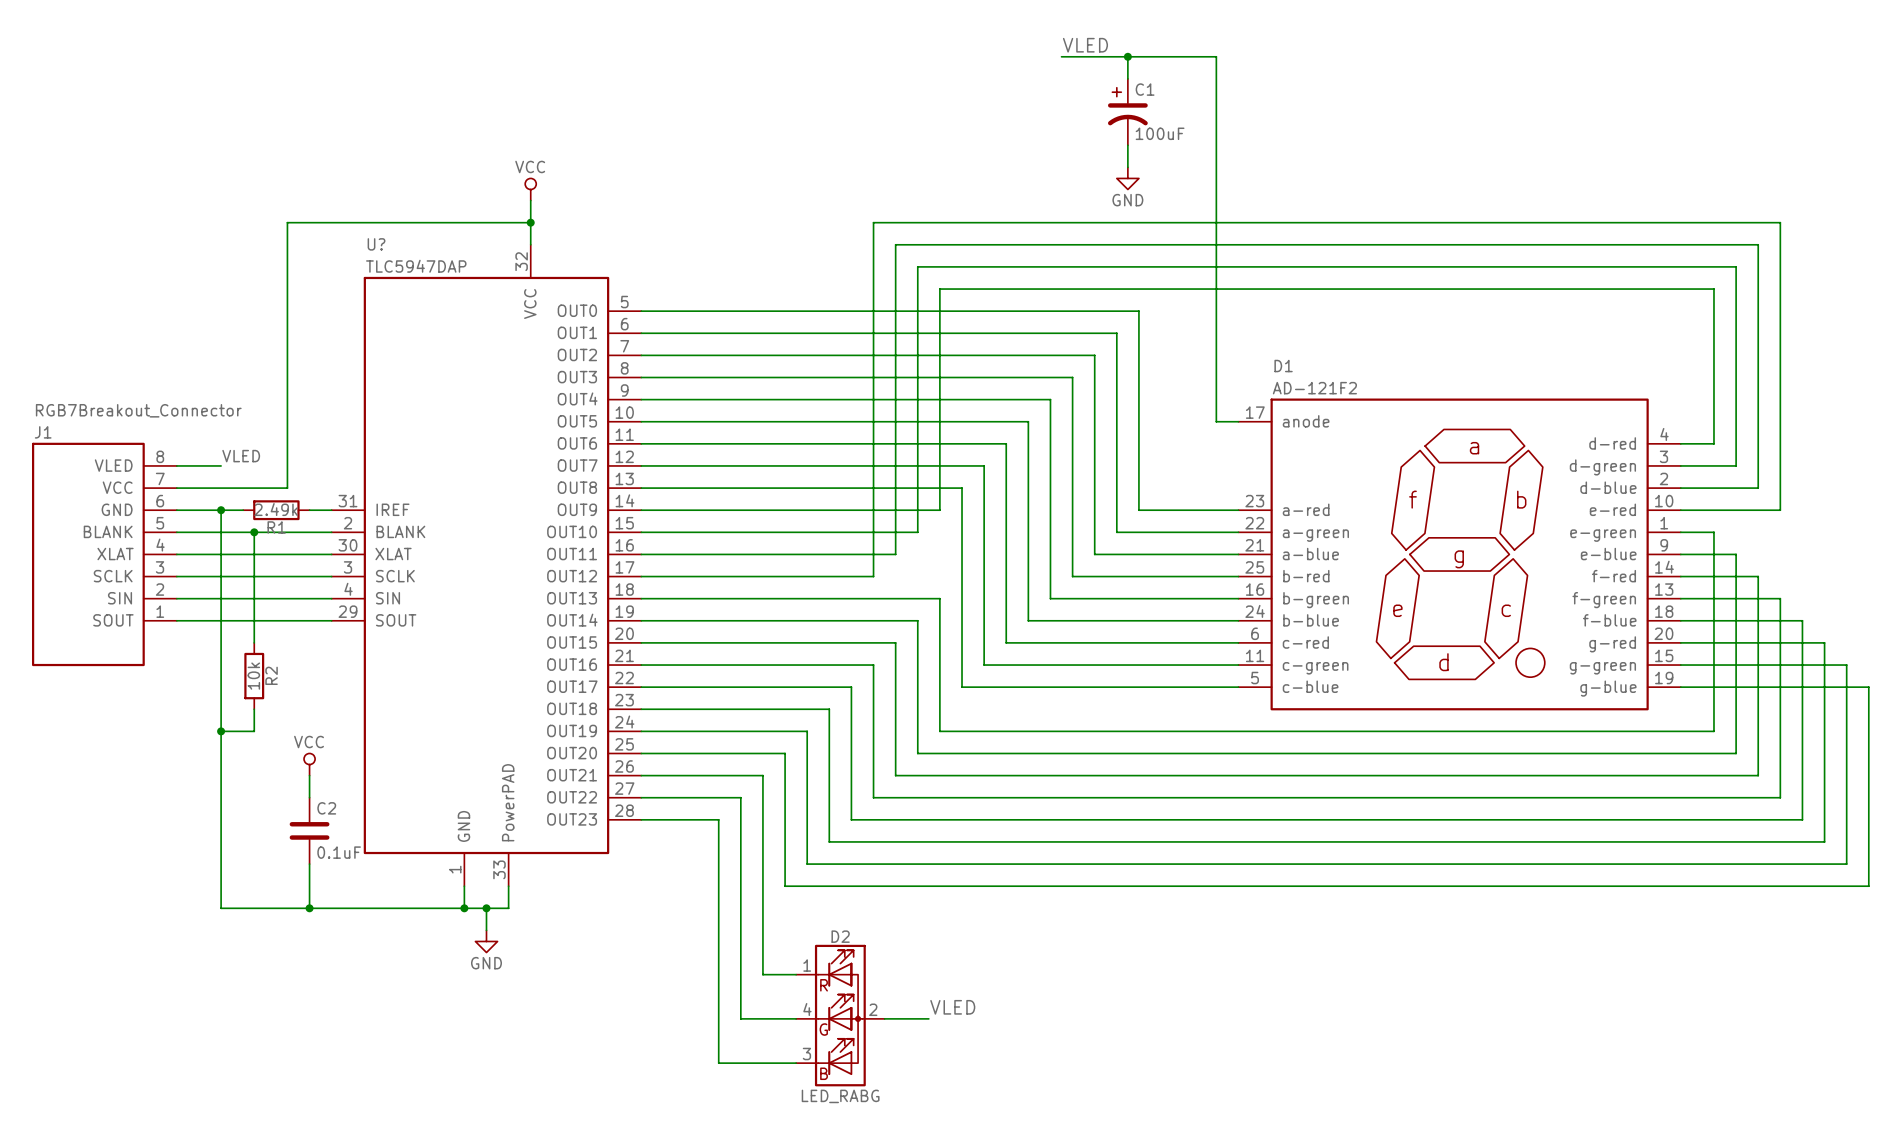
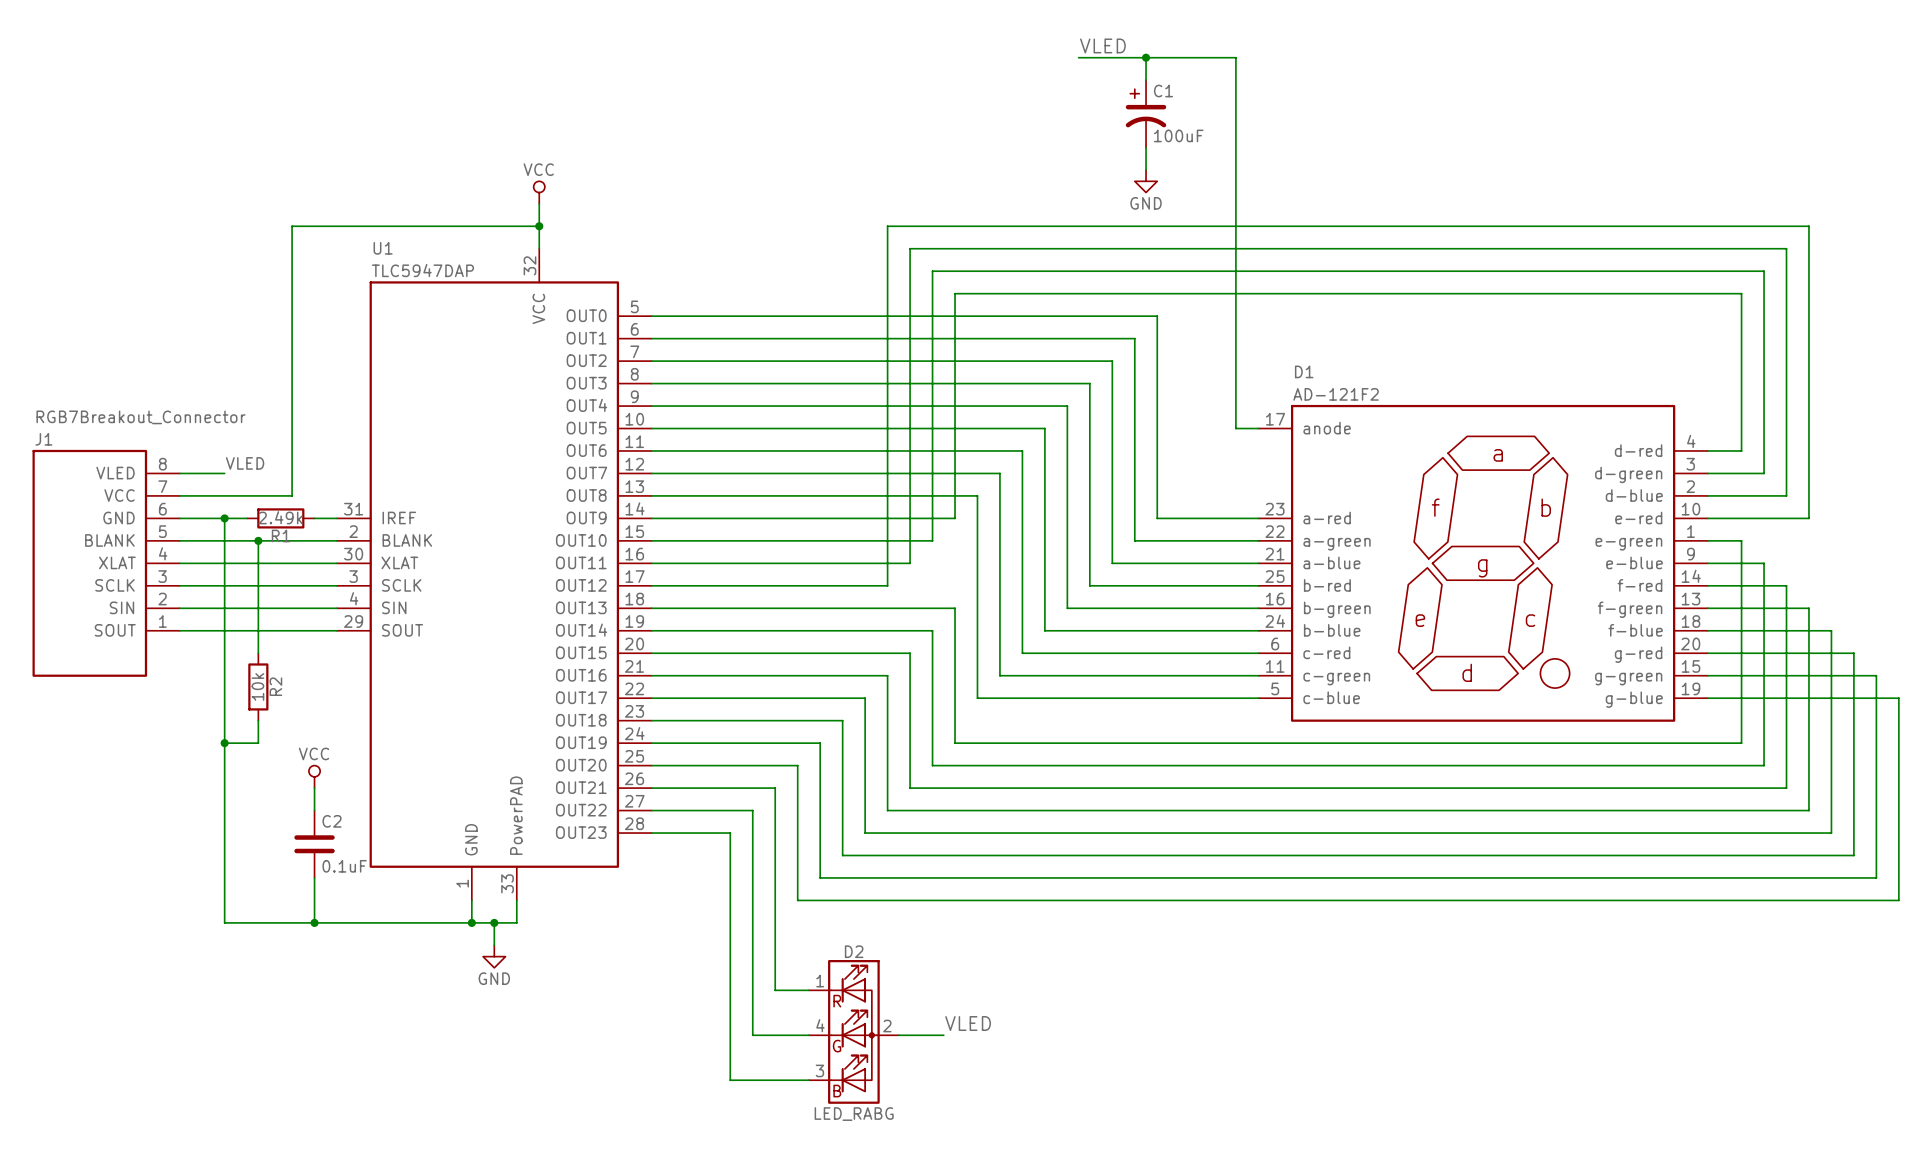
U? name: U? (376, 244) -> U1 (383, 248)

